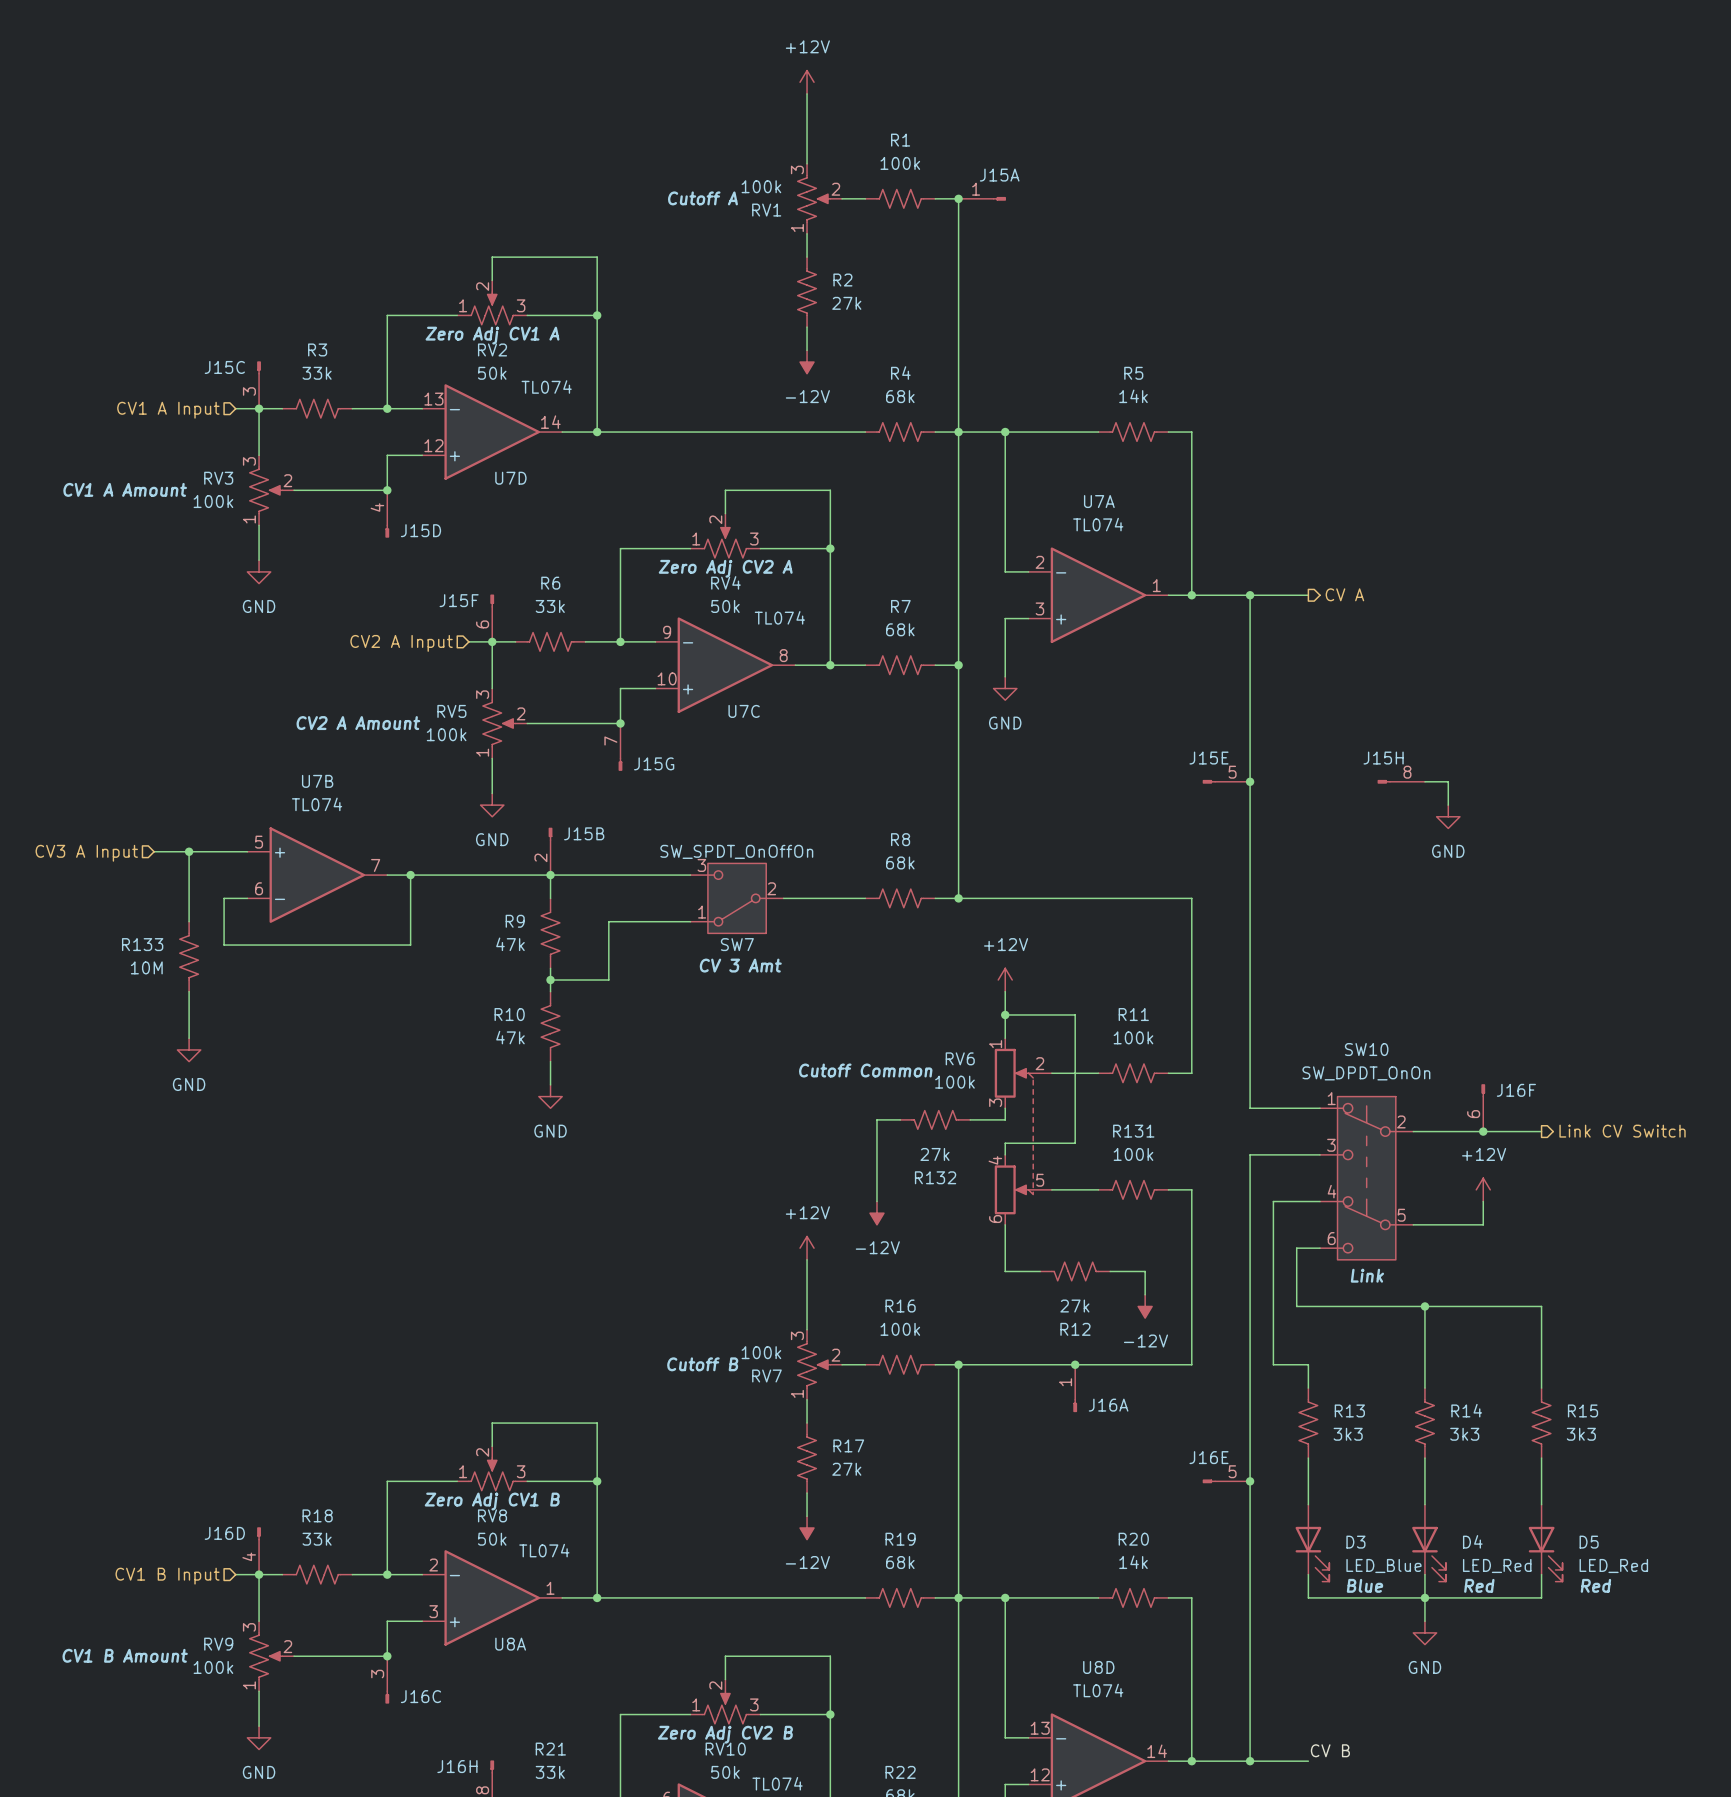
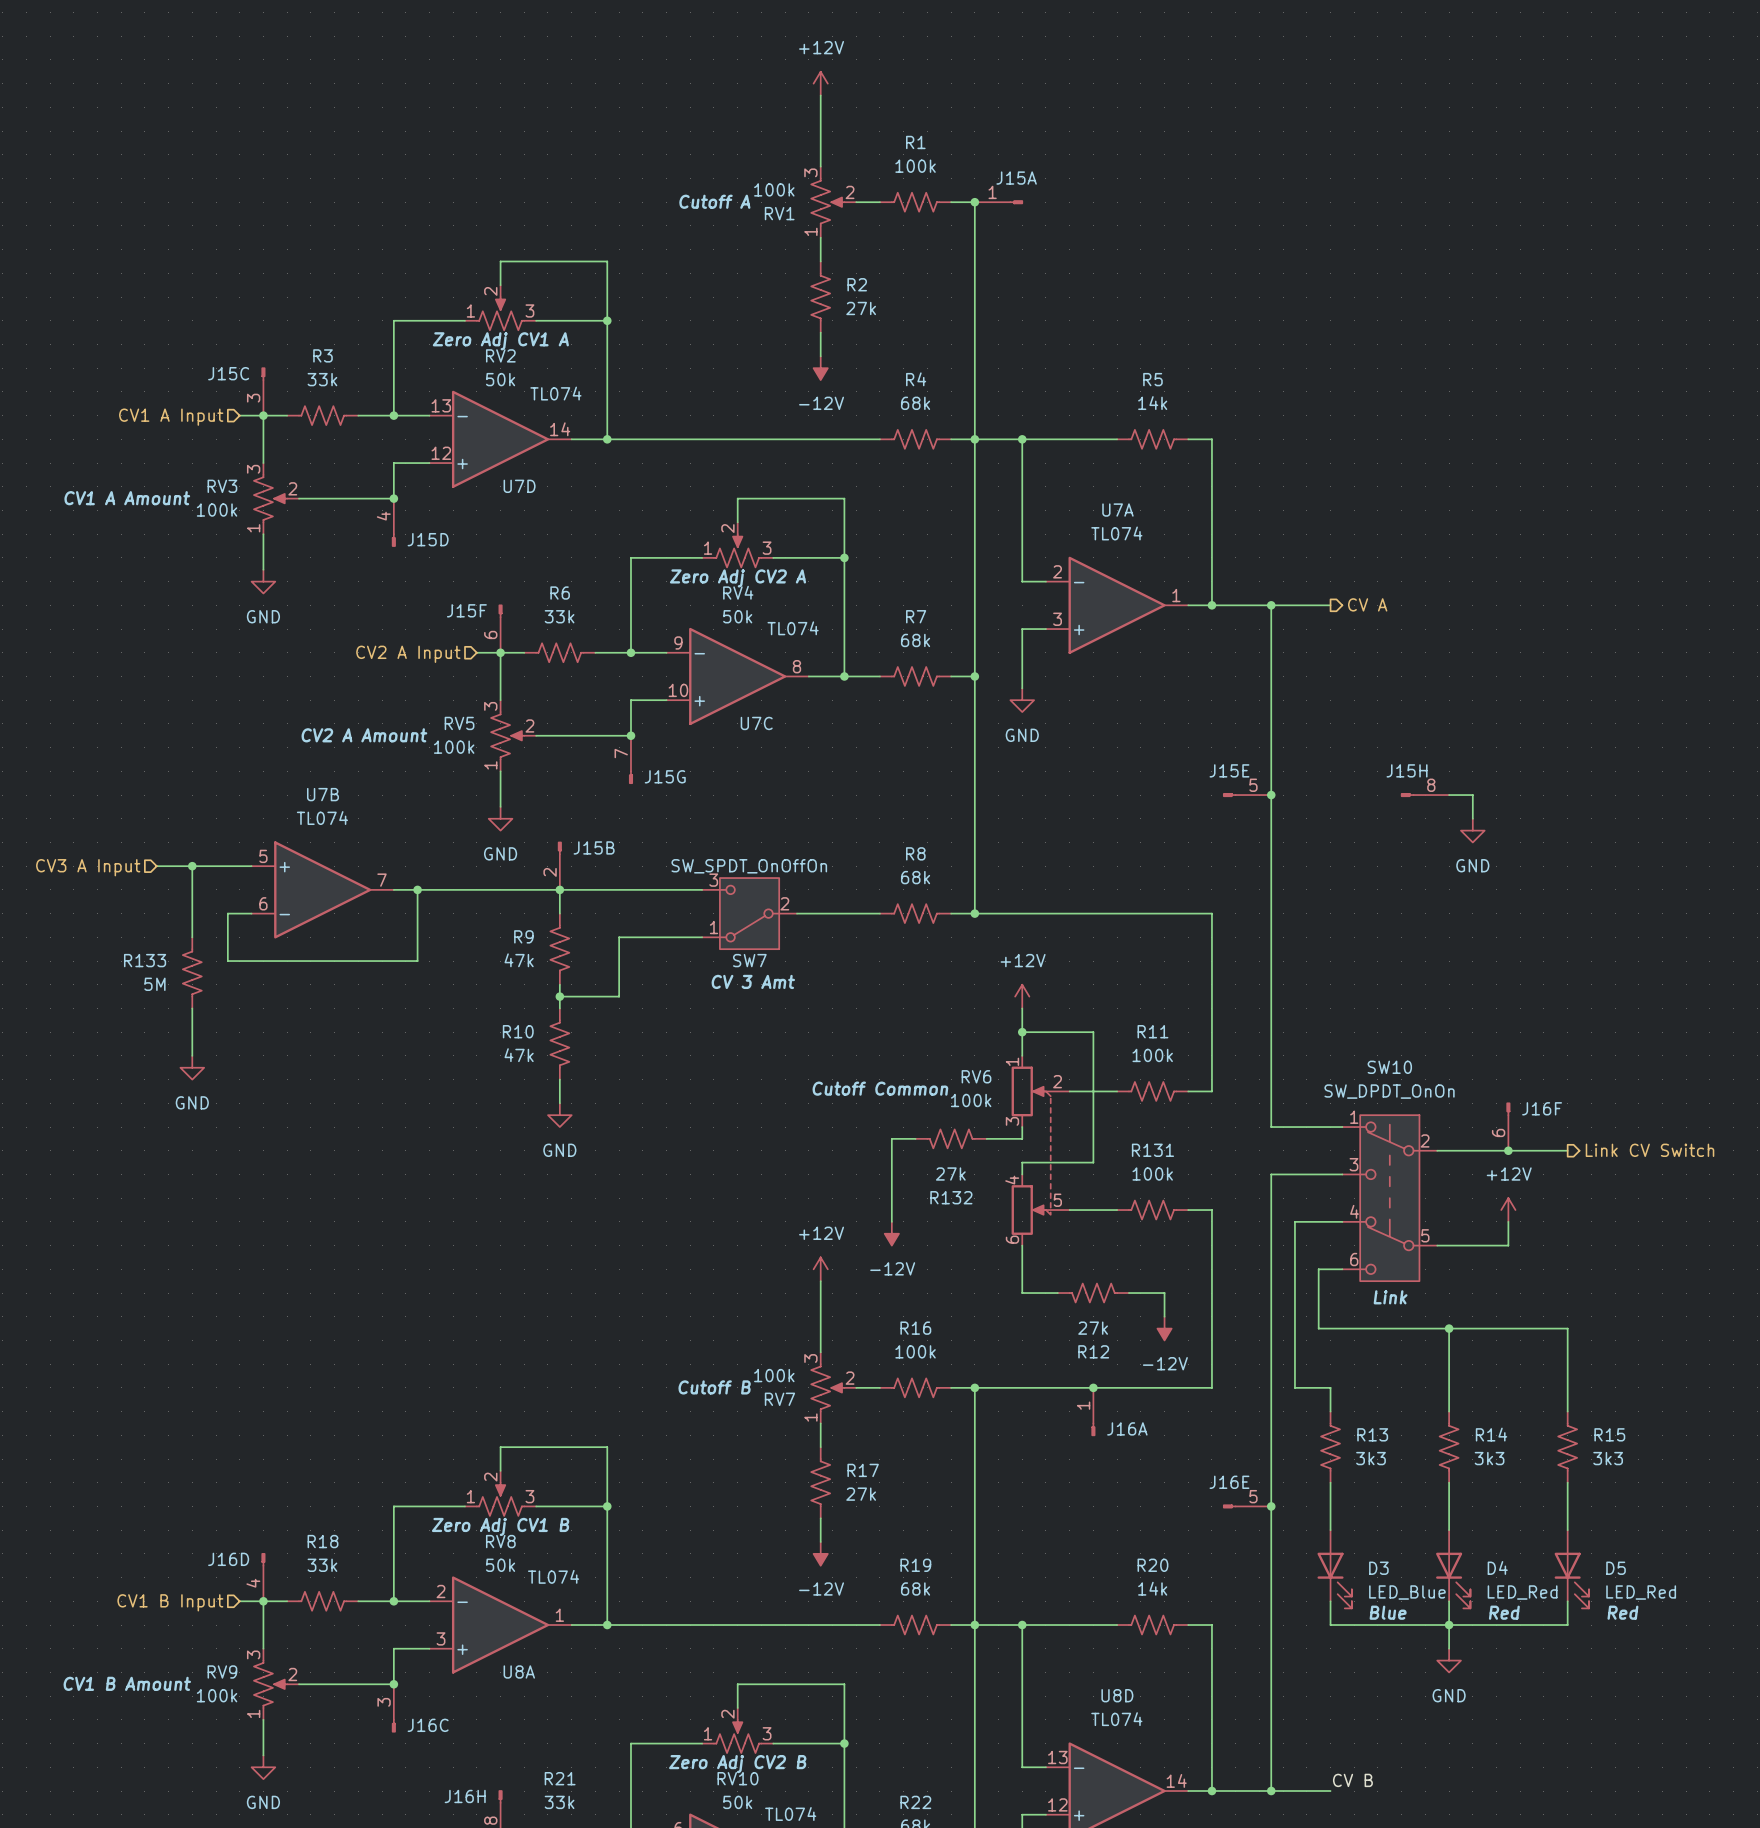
R133 value: 10M (146, 967) -> 5M (154, 984)

